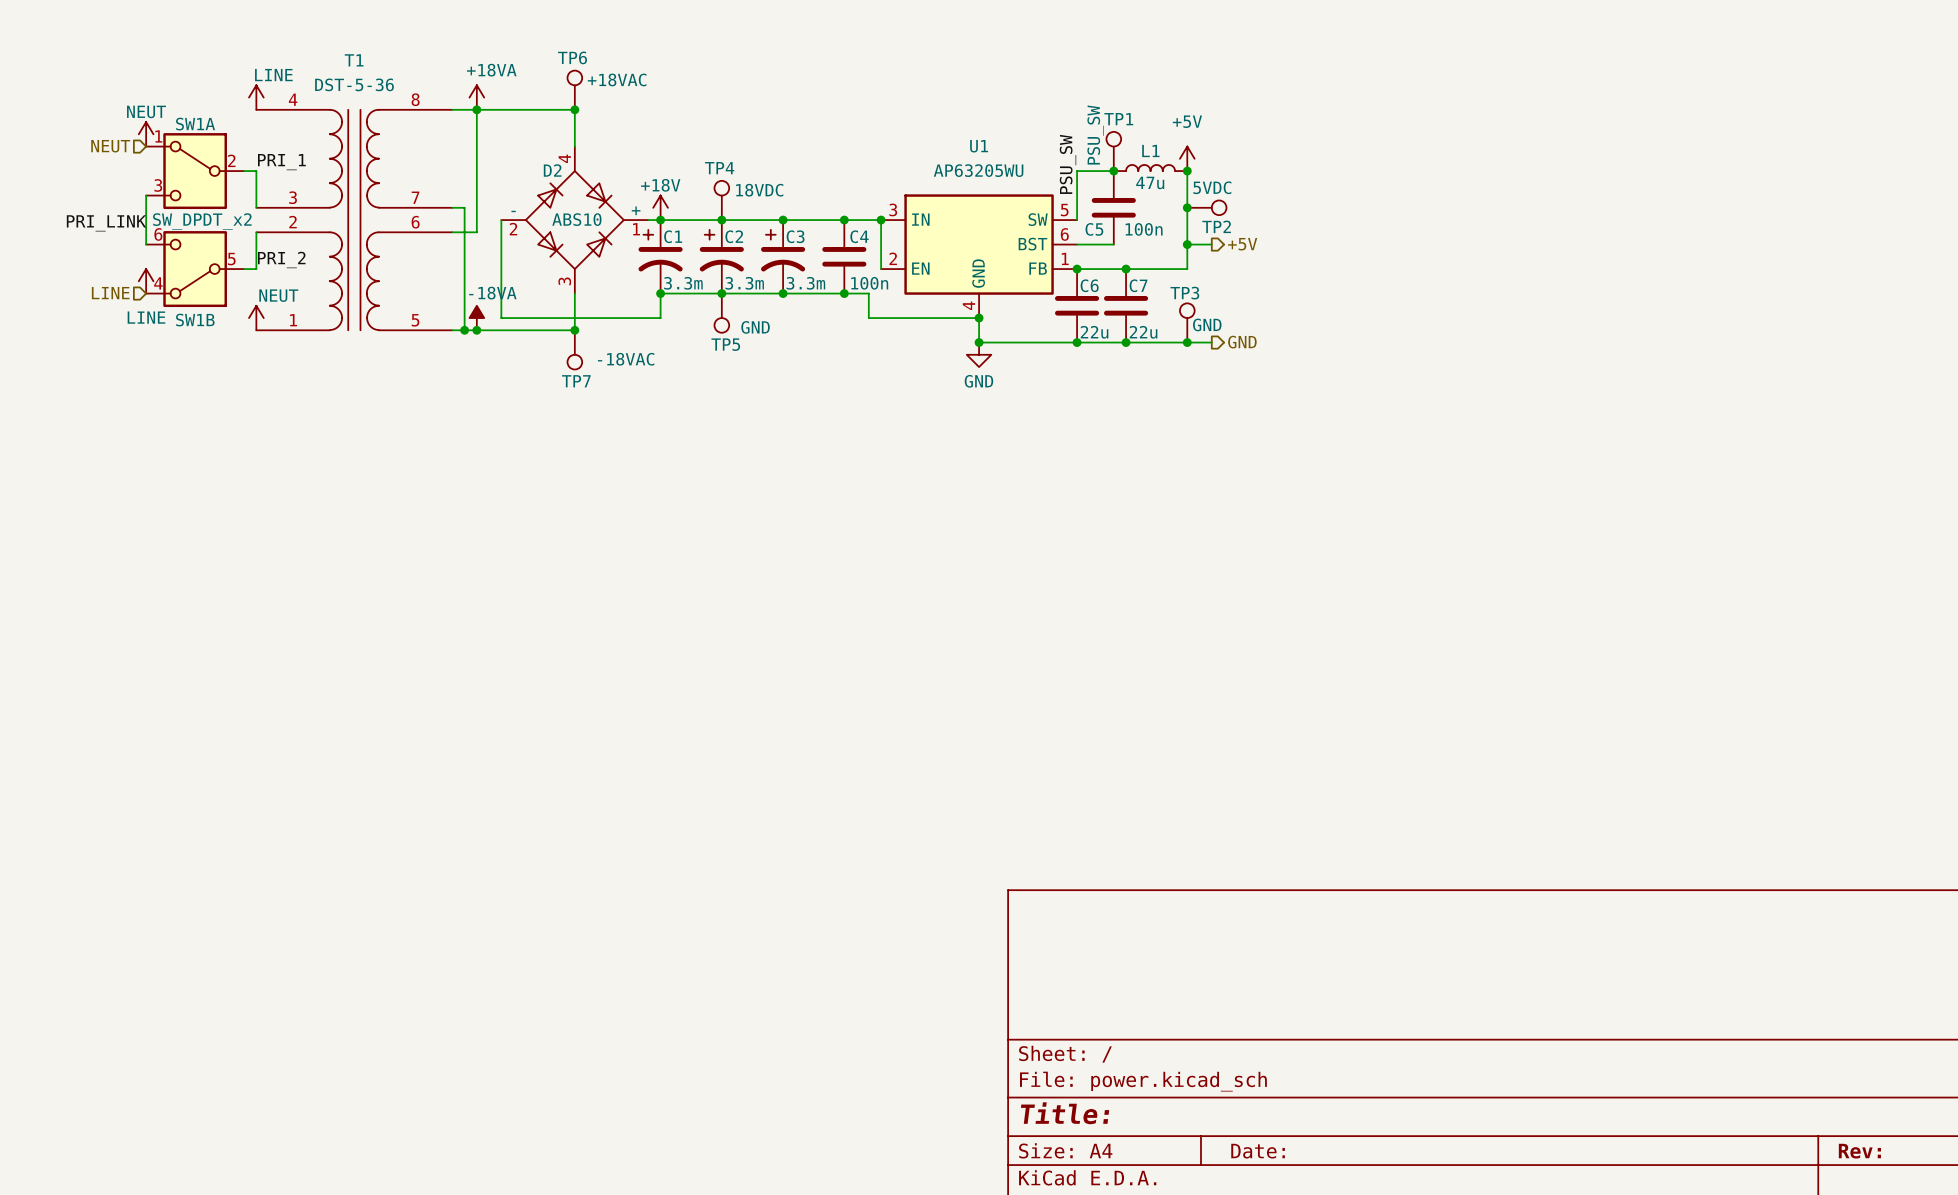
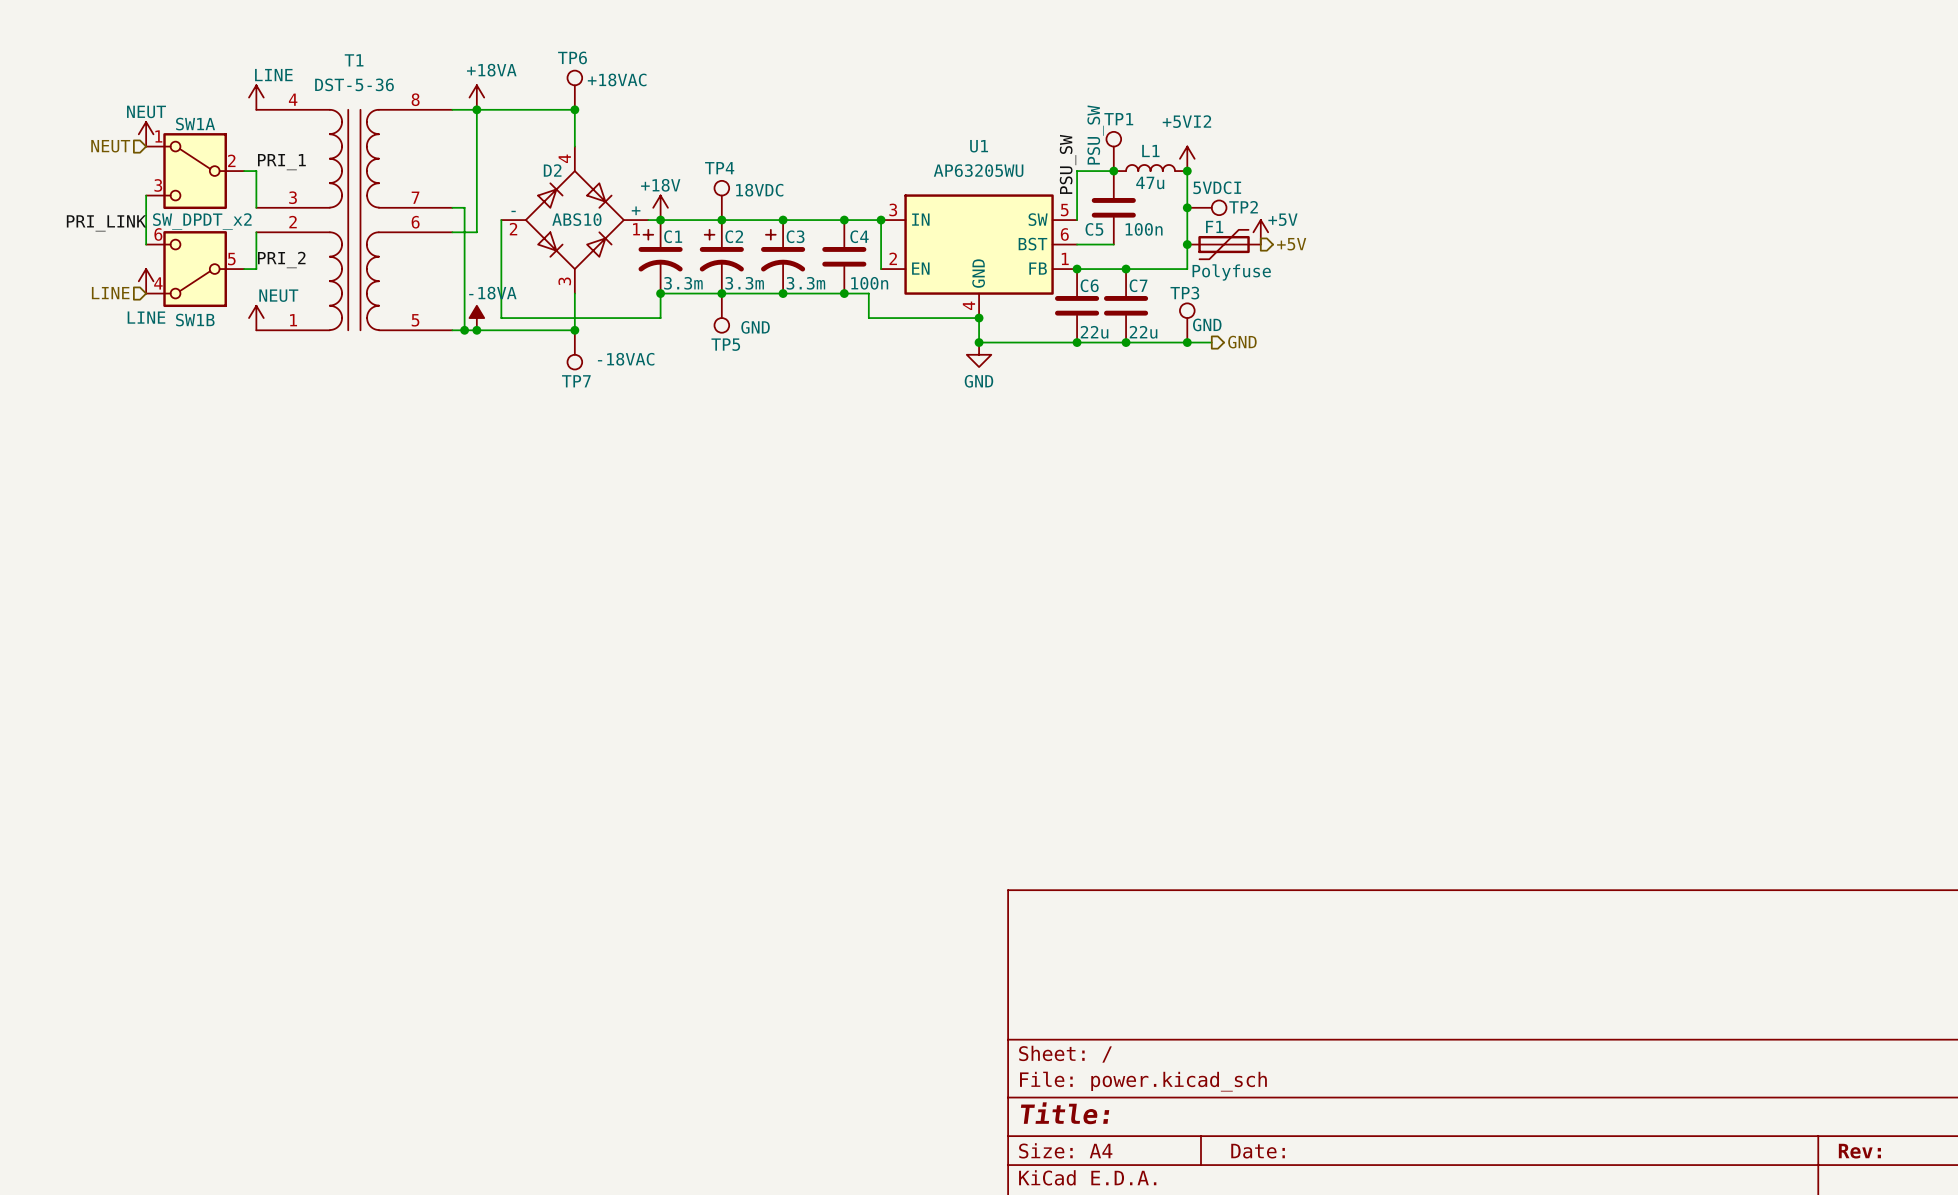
power symbol: +5V (1187, 158) -> +5VI2 (1187, 158)
TP2 value: 5VDC (1212, 187) -> 5VDCI (1217, 187)
TP2 name position: TP2 (1216, 226) -> TP2 (1243, 207)
power symbol: none -> +5V (1260, 232)
F1: none -> Polyfuse (1224, 244)
hierarchical label position: +5V (1242, 244) -> +5V (1291, 244)

